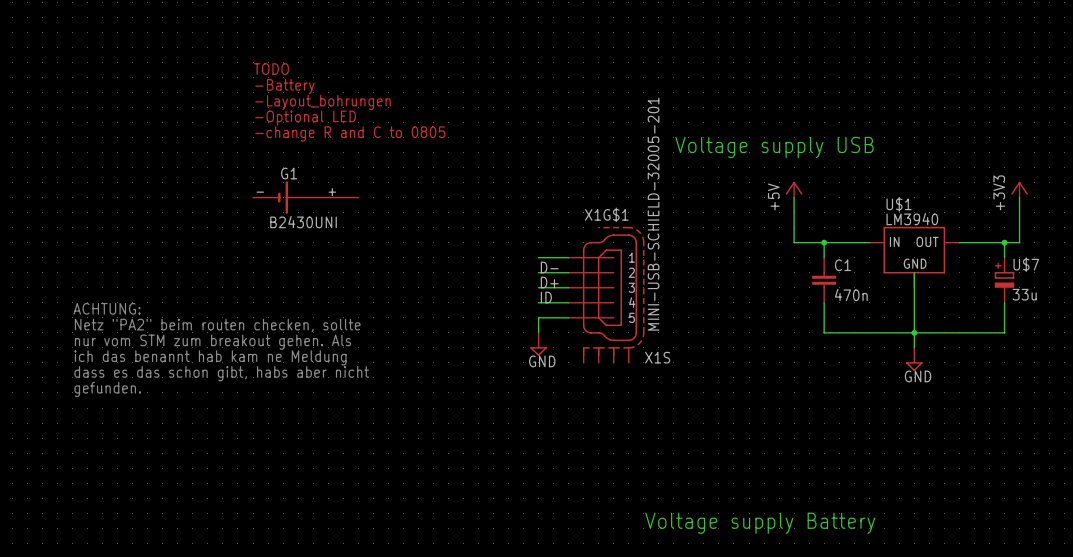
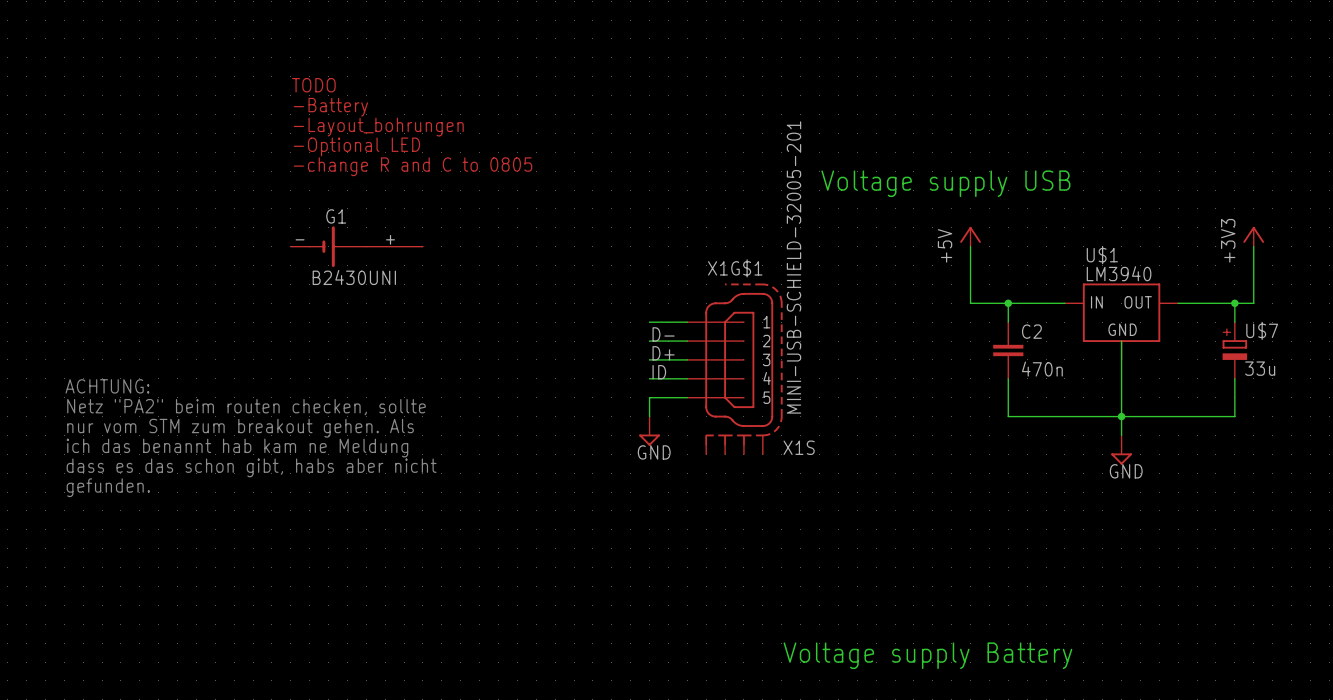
C1 name: C1 (842, 265) -> C2 (1031, 331)

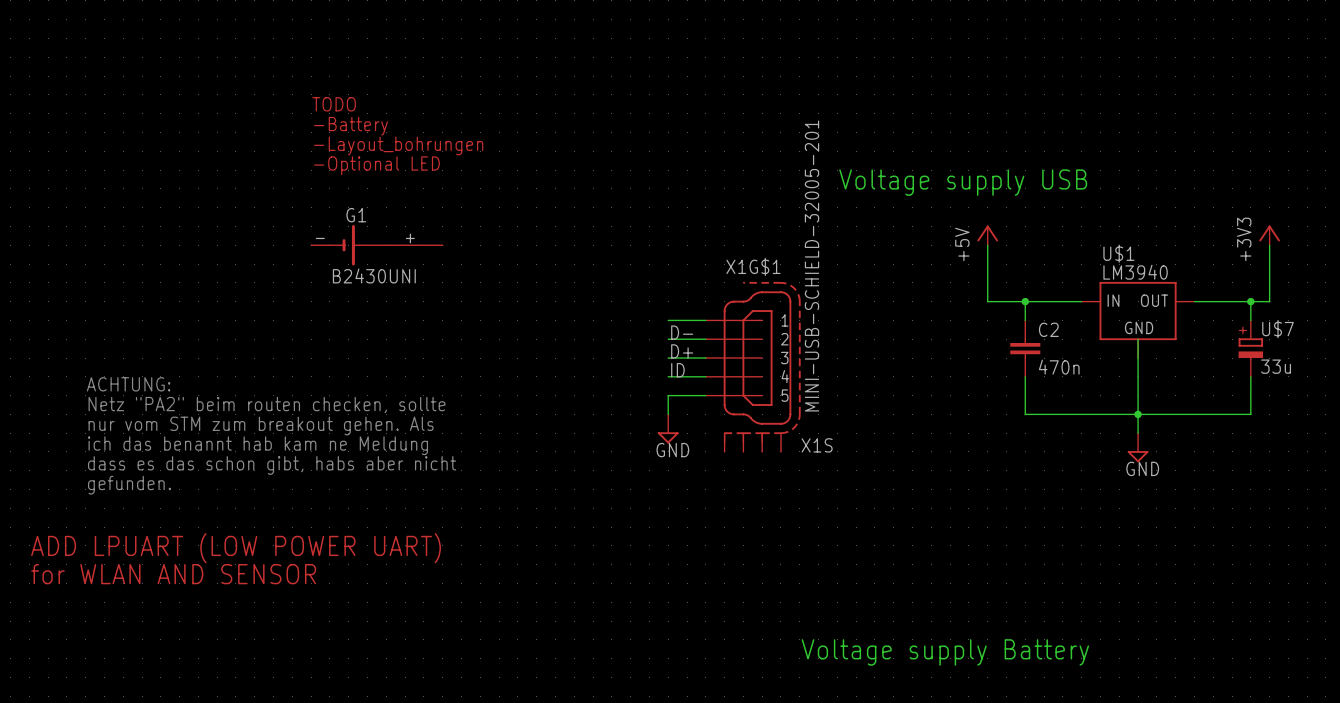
text: TODO (313, 85) -> none
text: -Battery (330, 107) -> TODO (334, 104)
text: -Layout_bohrungen (378, 127) -> -Battery (351, 126)
text: -Optional LED (356, 146) -> -Layout_bohrungen (398, 145)
text: -change R and C to 0805 (413, 166) -> -Optional LED (376, 165)
text: none -> ADD LPUART (LOW POWER UART) (236, 548)
text: none -> for WLAN AND SENSOR (173, 574)

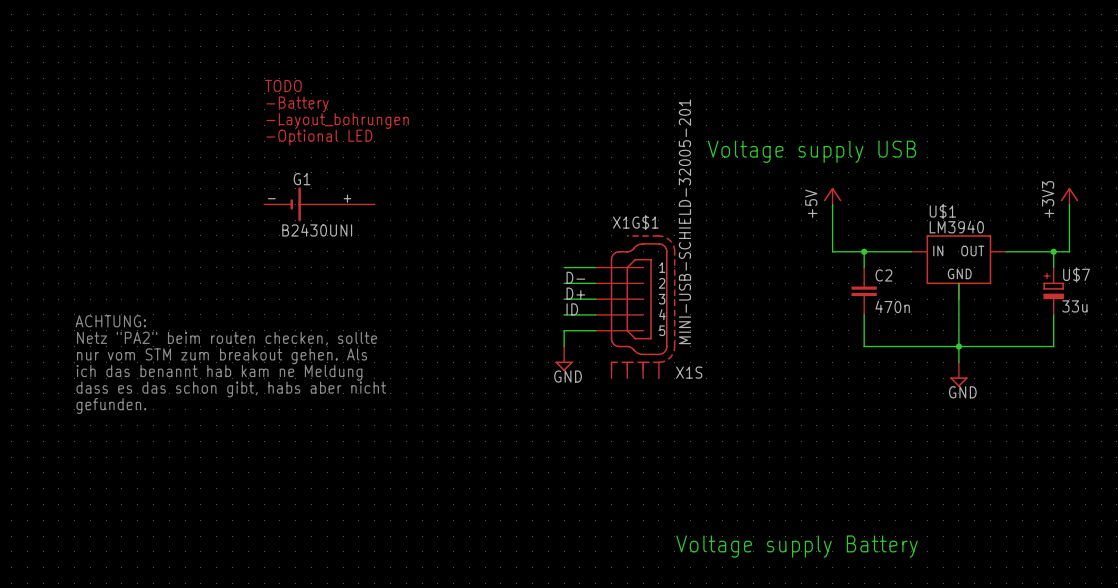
text: ADD LPUART (LOW POWER UART) (236, 548) -> none
text: for WLAN AND SENSOR (173, 574) -> none

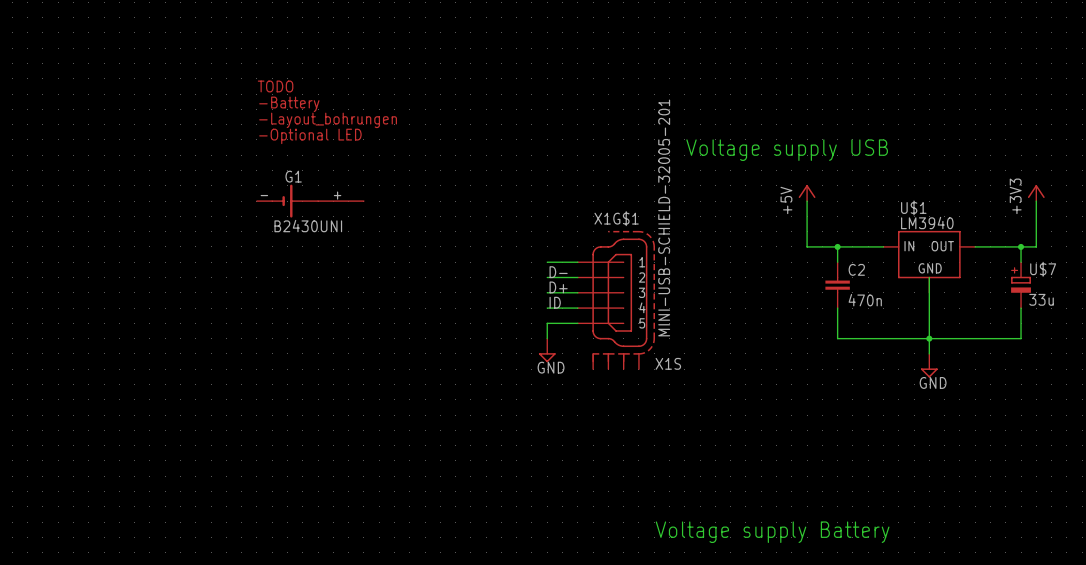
text: ACHTUNG: (110, 321) -> none
text: Netz "PA2" beim routen checken, sollte (227, 338) -> none
text: nur vom STM zum breakout gehen. Als (222, 356) -> none
text: ich das benannt hab kam ne Meldung (219, 372) -> none
text: dass es das schon gibt, habs aber nicht (231, 389) -> none
text: gefunden. (111, 406) -> none

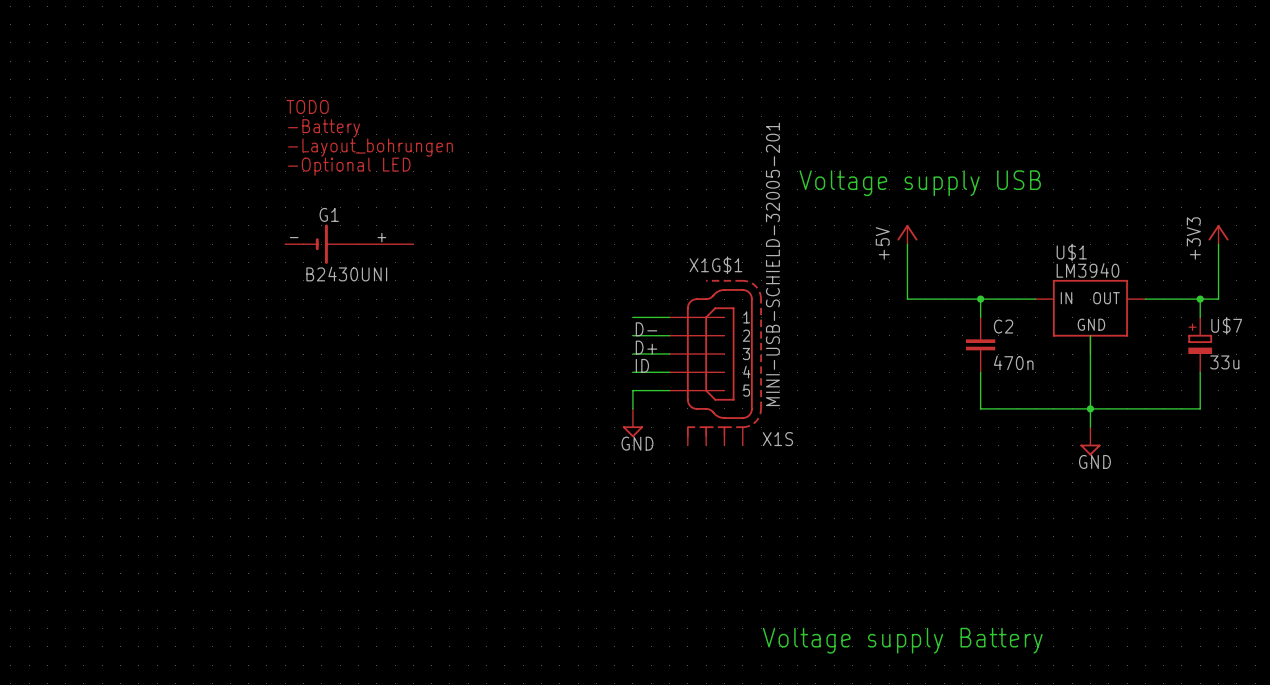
power symbol position: +5V (807, 193) -> +5V (907, 234)
wire: (807, 201) (807, 246) -> (907, 244) (907, 299) (944, 299)

